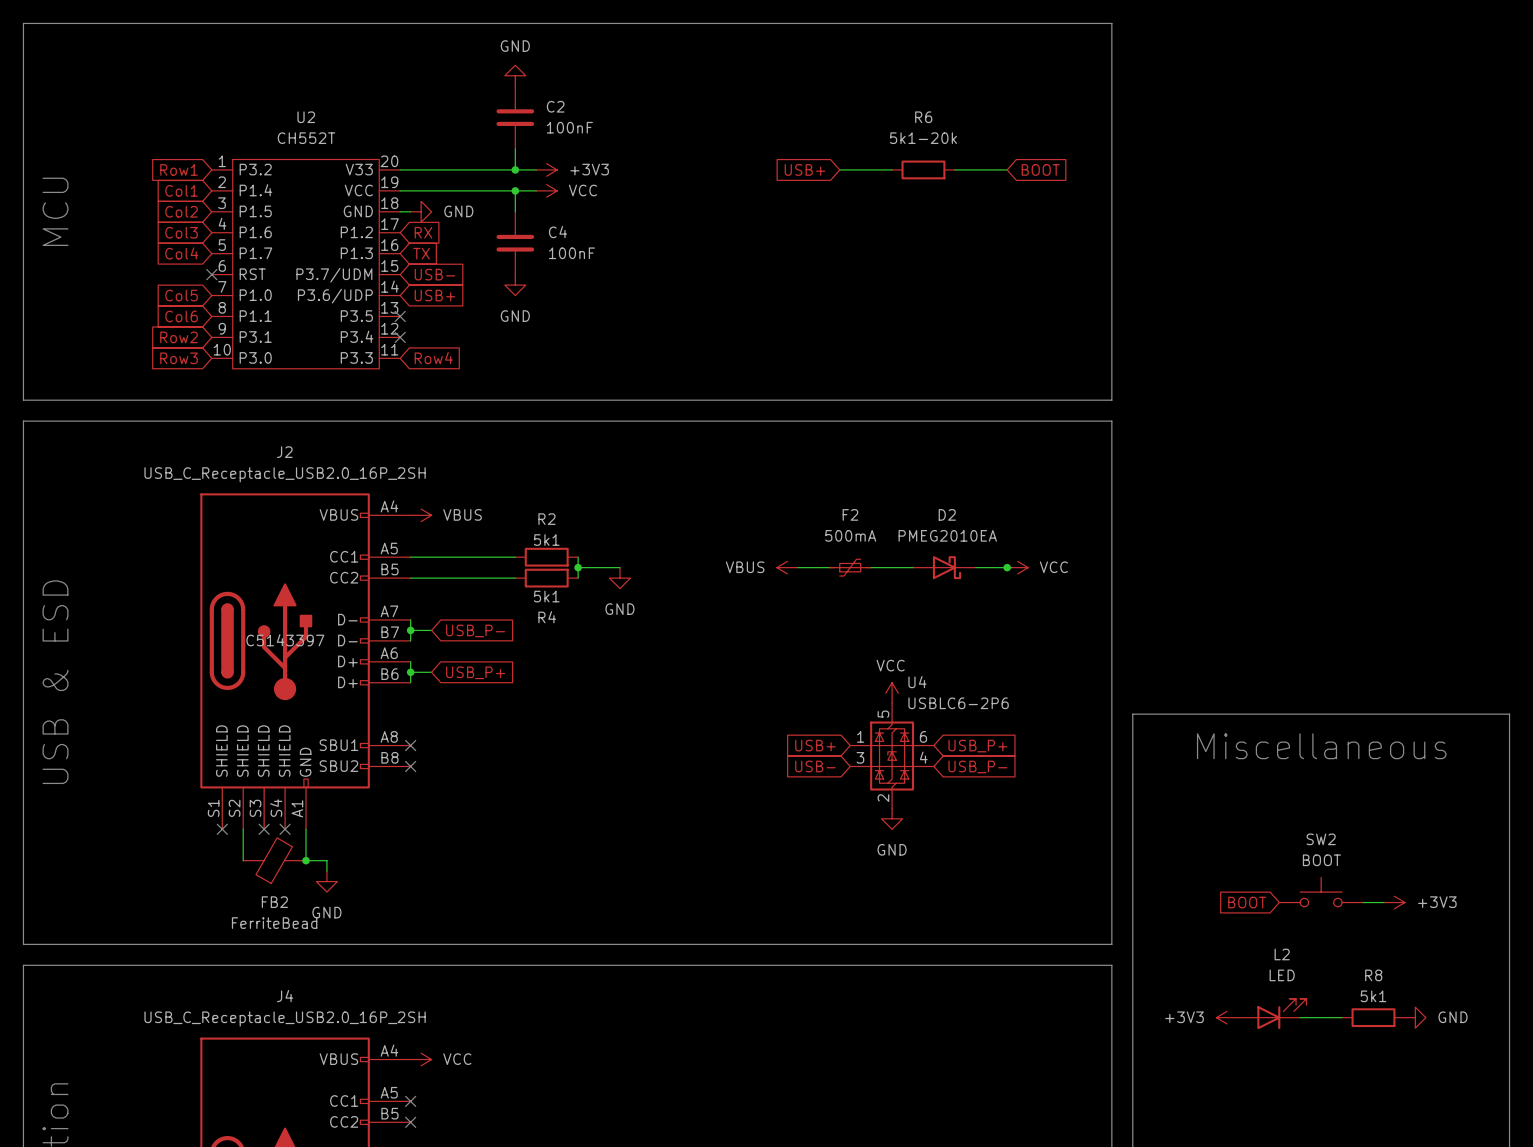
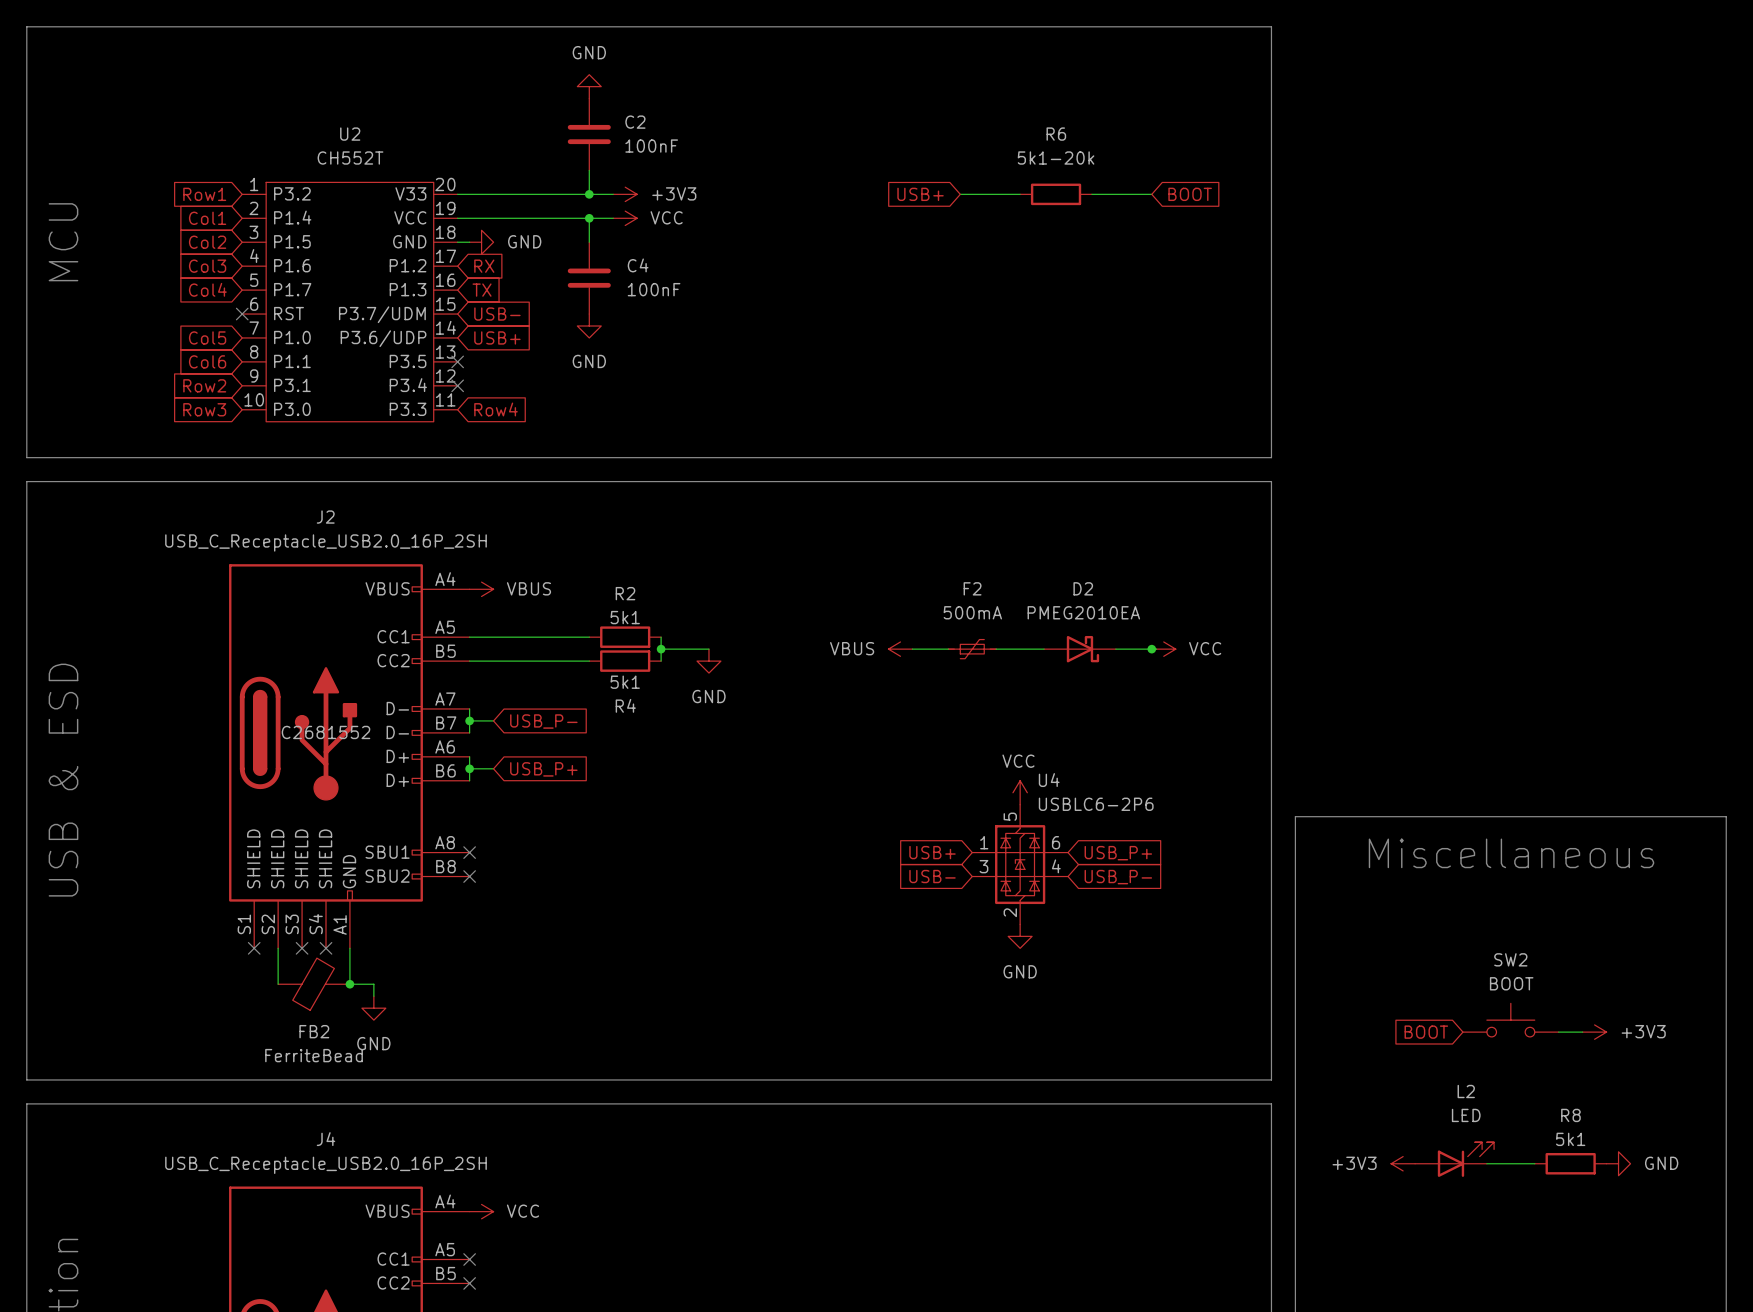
J2 text: C5143397 (285, 640) -> C2681552 (326, 732)

